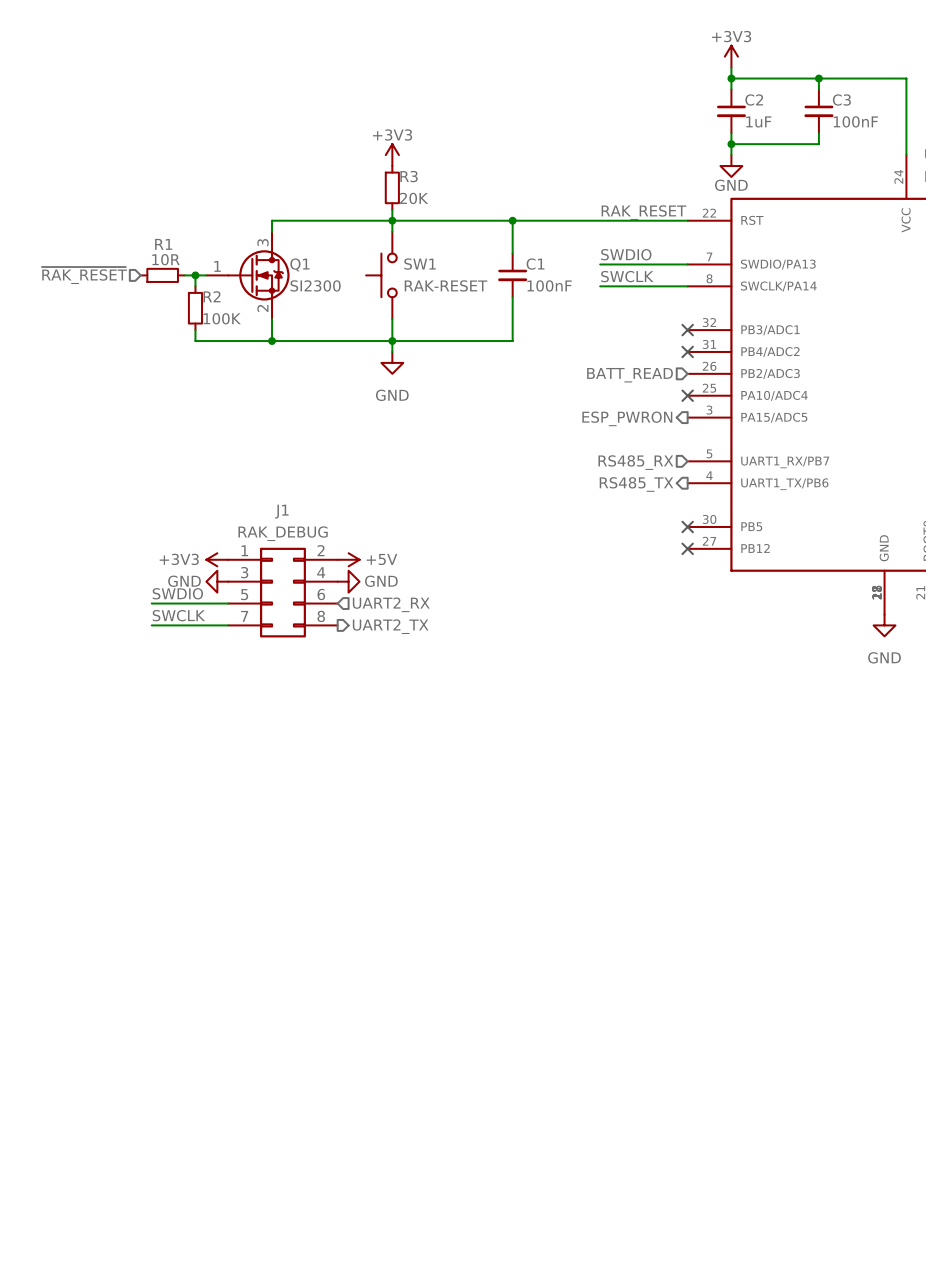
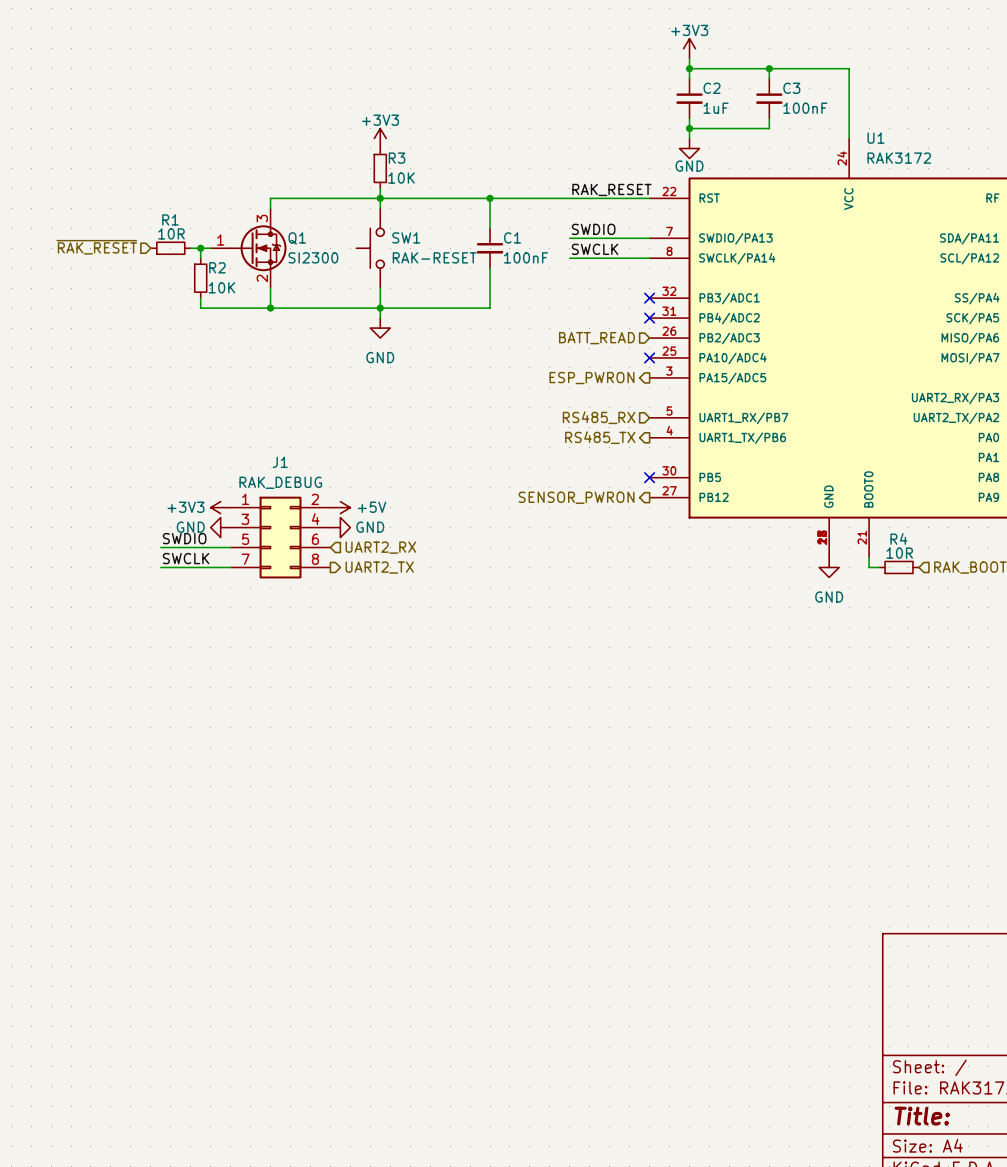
R3 value: 20K (414, 198) -> 10K (401, 178)
R2 value: 100K (222, 318) -> 10K (221, 287)
no-connect mark: (687, 548) -> none
hierarchical label: none -> SENSOR_PWRON (576, 497)

